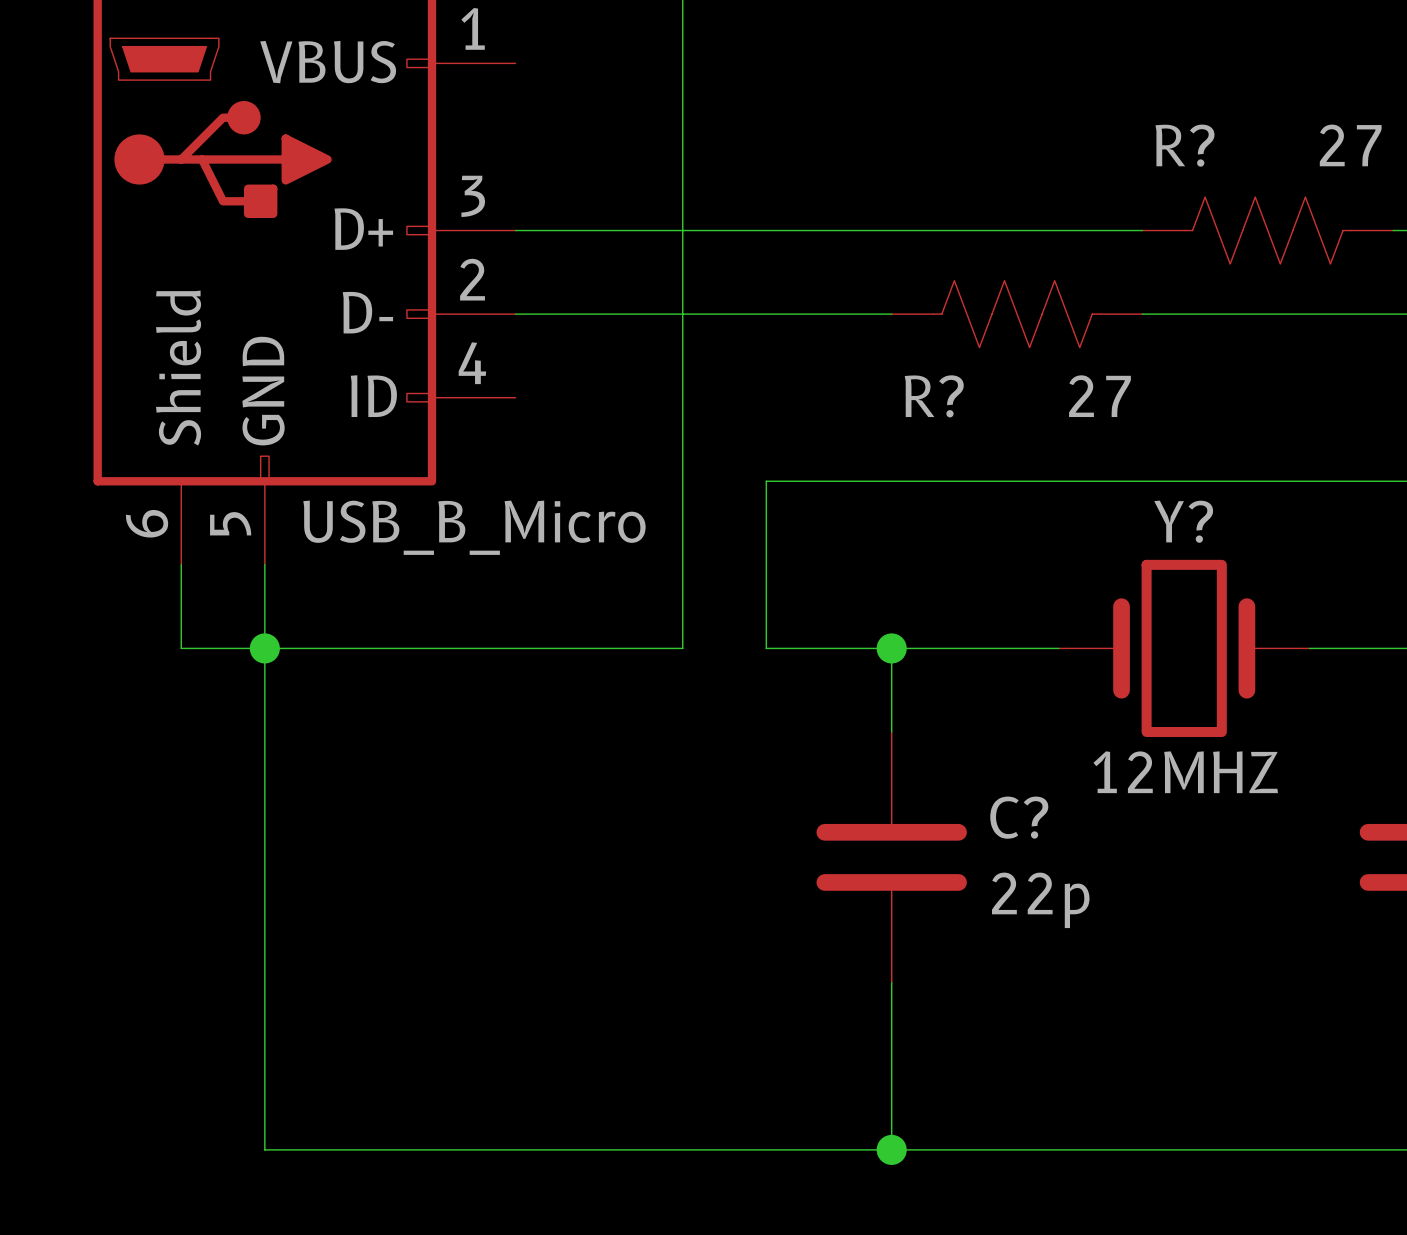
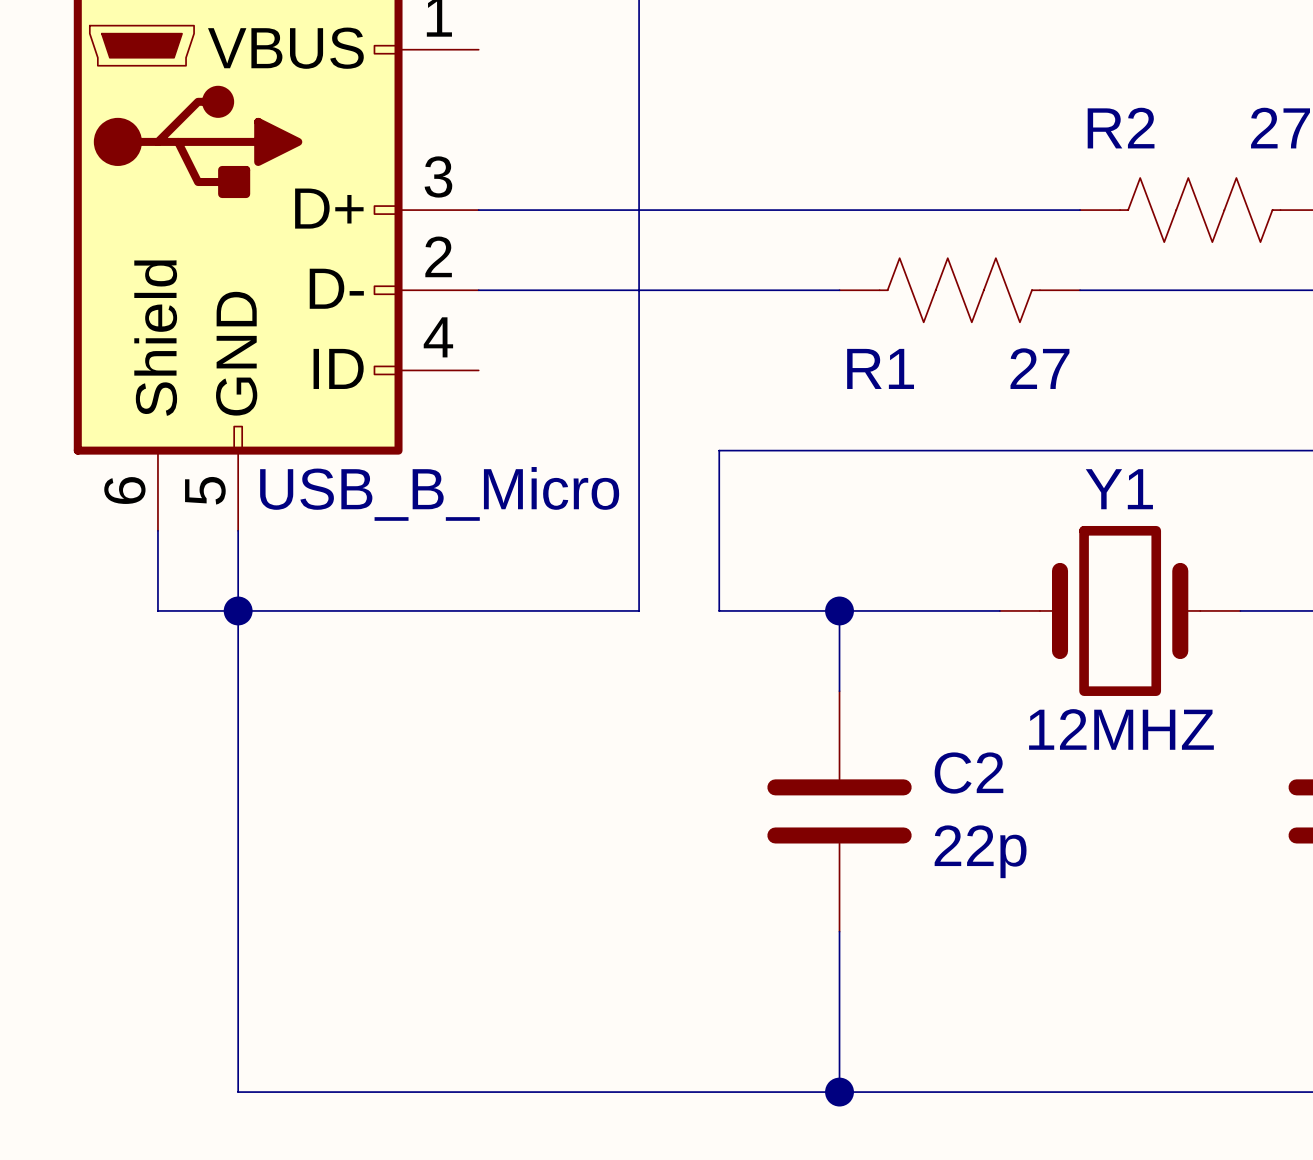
R? name: R? (1184, 145) -> R2 (1121, 128)
R? name: R? (934, 396) -> R1 (880, 368)
Y? name: Y? (1183, 521) -> Y1 (1119, 489)
C? name: C? (1019, 817) -> C2 (968, 773)

